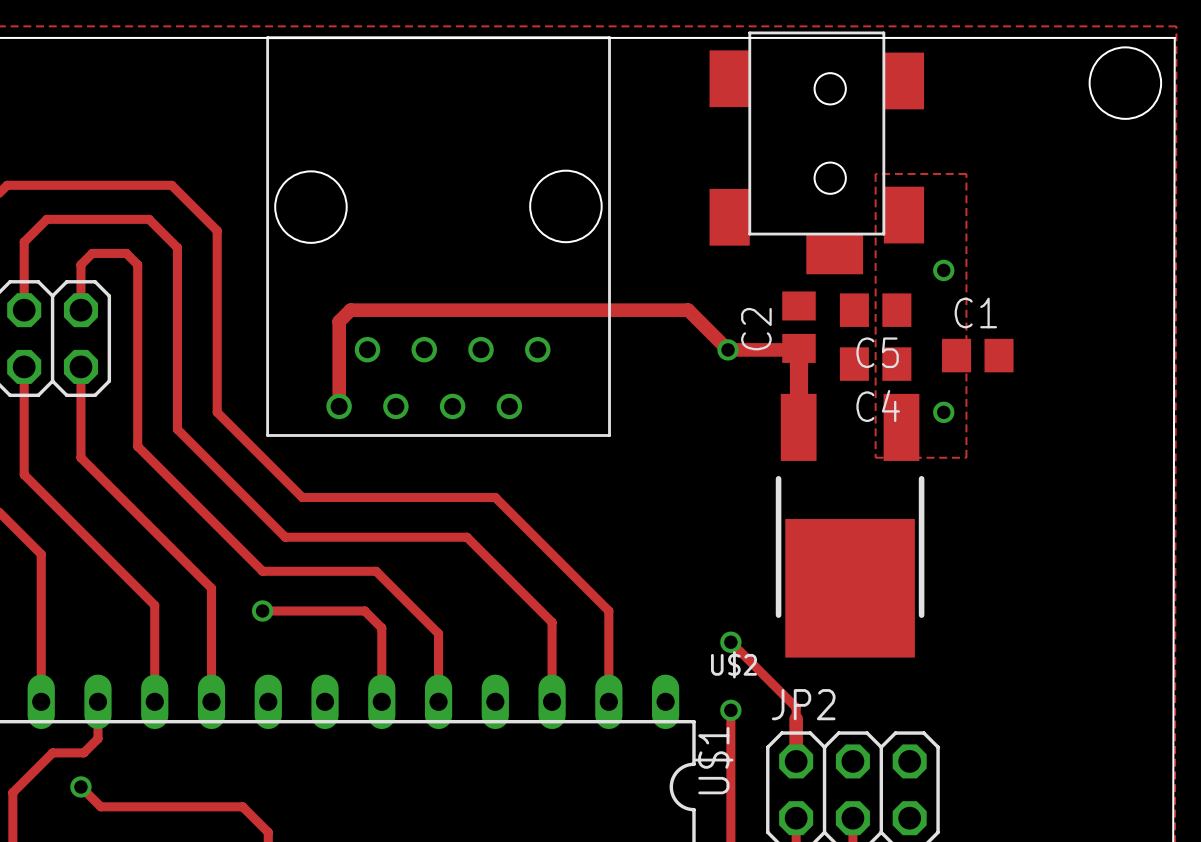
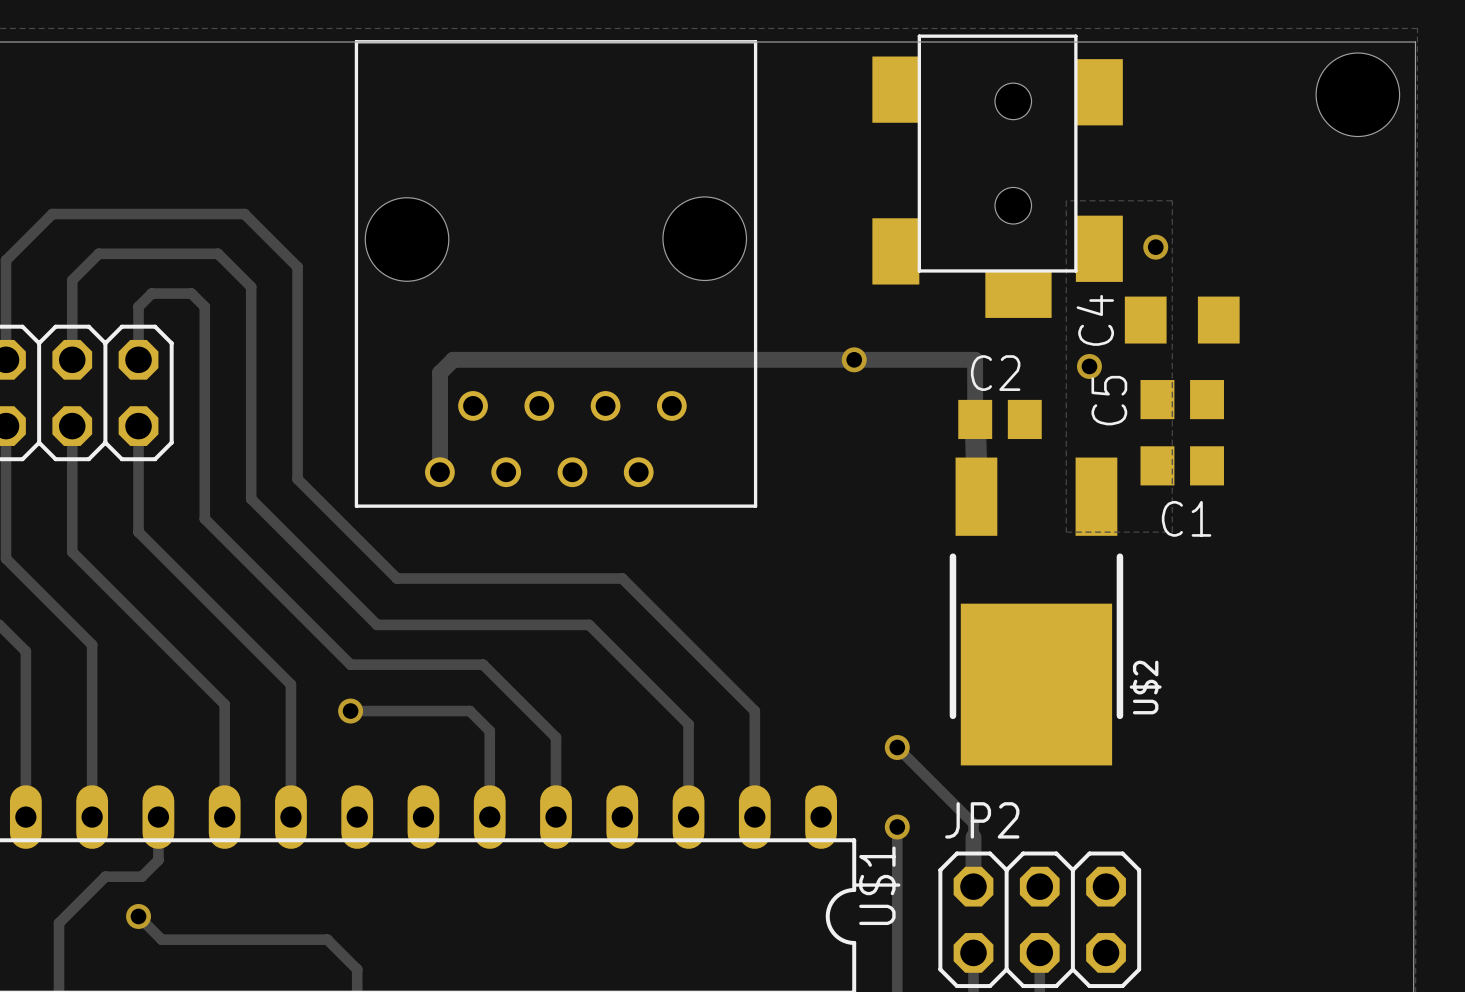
via: none -> (1155, 247)
via: (943, 270) -> none
track: (688, 310) (728, 349) (798, 348) (798, 410) -> (847, 359) (975, 359) (976, 476)
C5 position: (875, 310) -> (1182, 399)
C1 name position: C1 (975, 313) -> C1 (1186, 518)
via: none -> (1089, 366)
C2 rotation: 0° (798, 327) -> 90° clockwise (1000, 419)
C4 footprint: [839, 347, 912, 381] -> [1124, 296, 1240, 344]
via position: (728, 349) -> (854, 359)
C5 name rotation: 0° (877, 352) -> 90° counterclockwise (1109, 400)
C1 position: (977, 355) -> (1182, 465)
C4 name position: C4 (878, 405) -> C4 (1095, 320)
via: (943, 412) -> none
U$2 name rotation: 0° (733, 664) -> 90° counterclockwise (1145, 687)
U$2 name position: U$2 (733, 664) -> U$2 (1145, 687)

